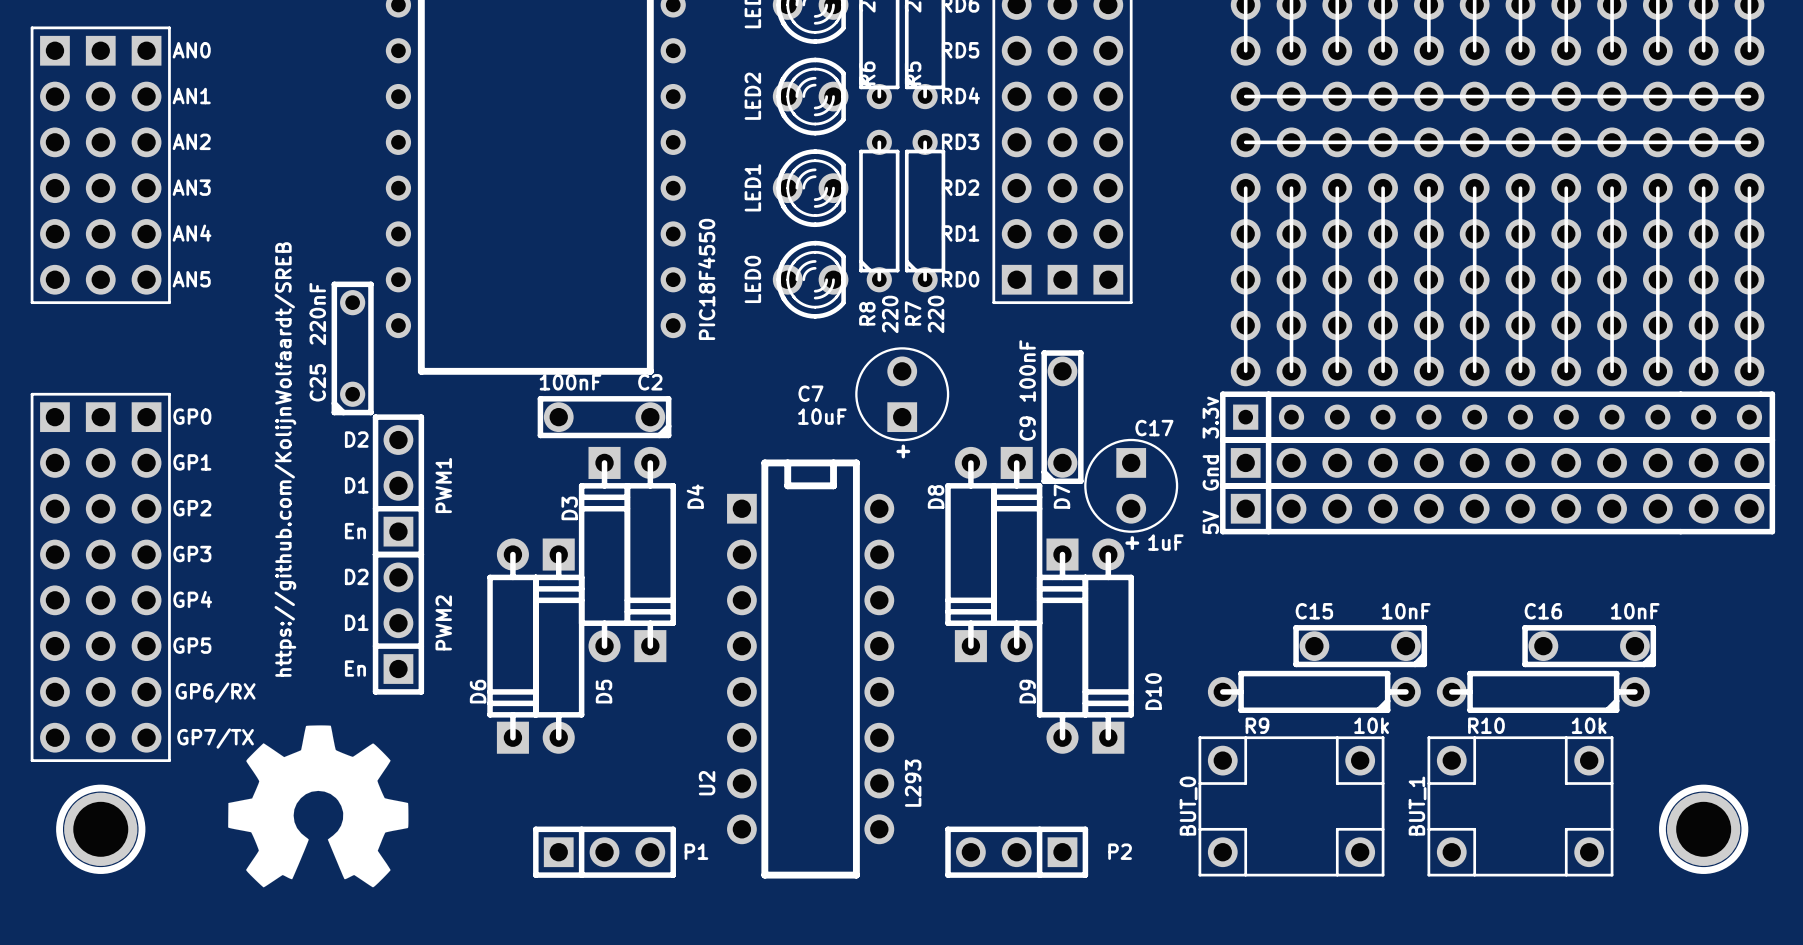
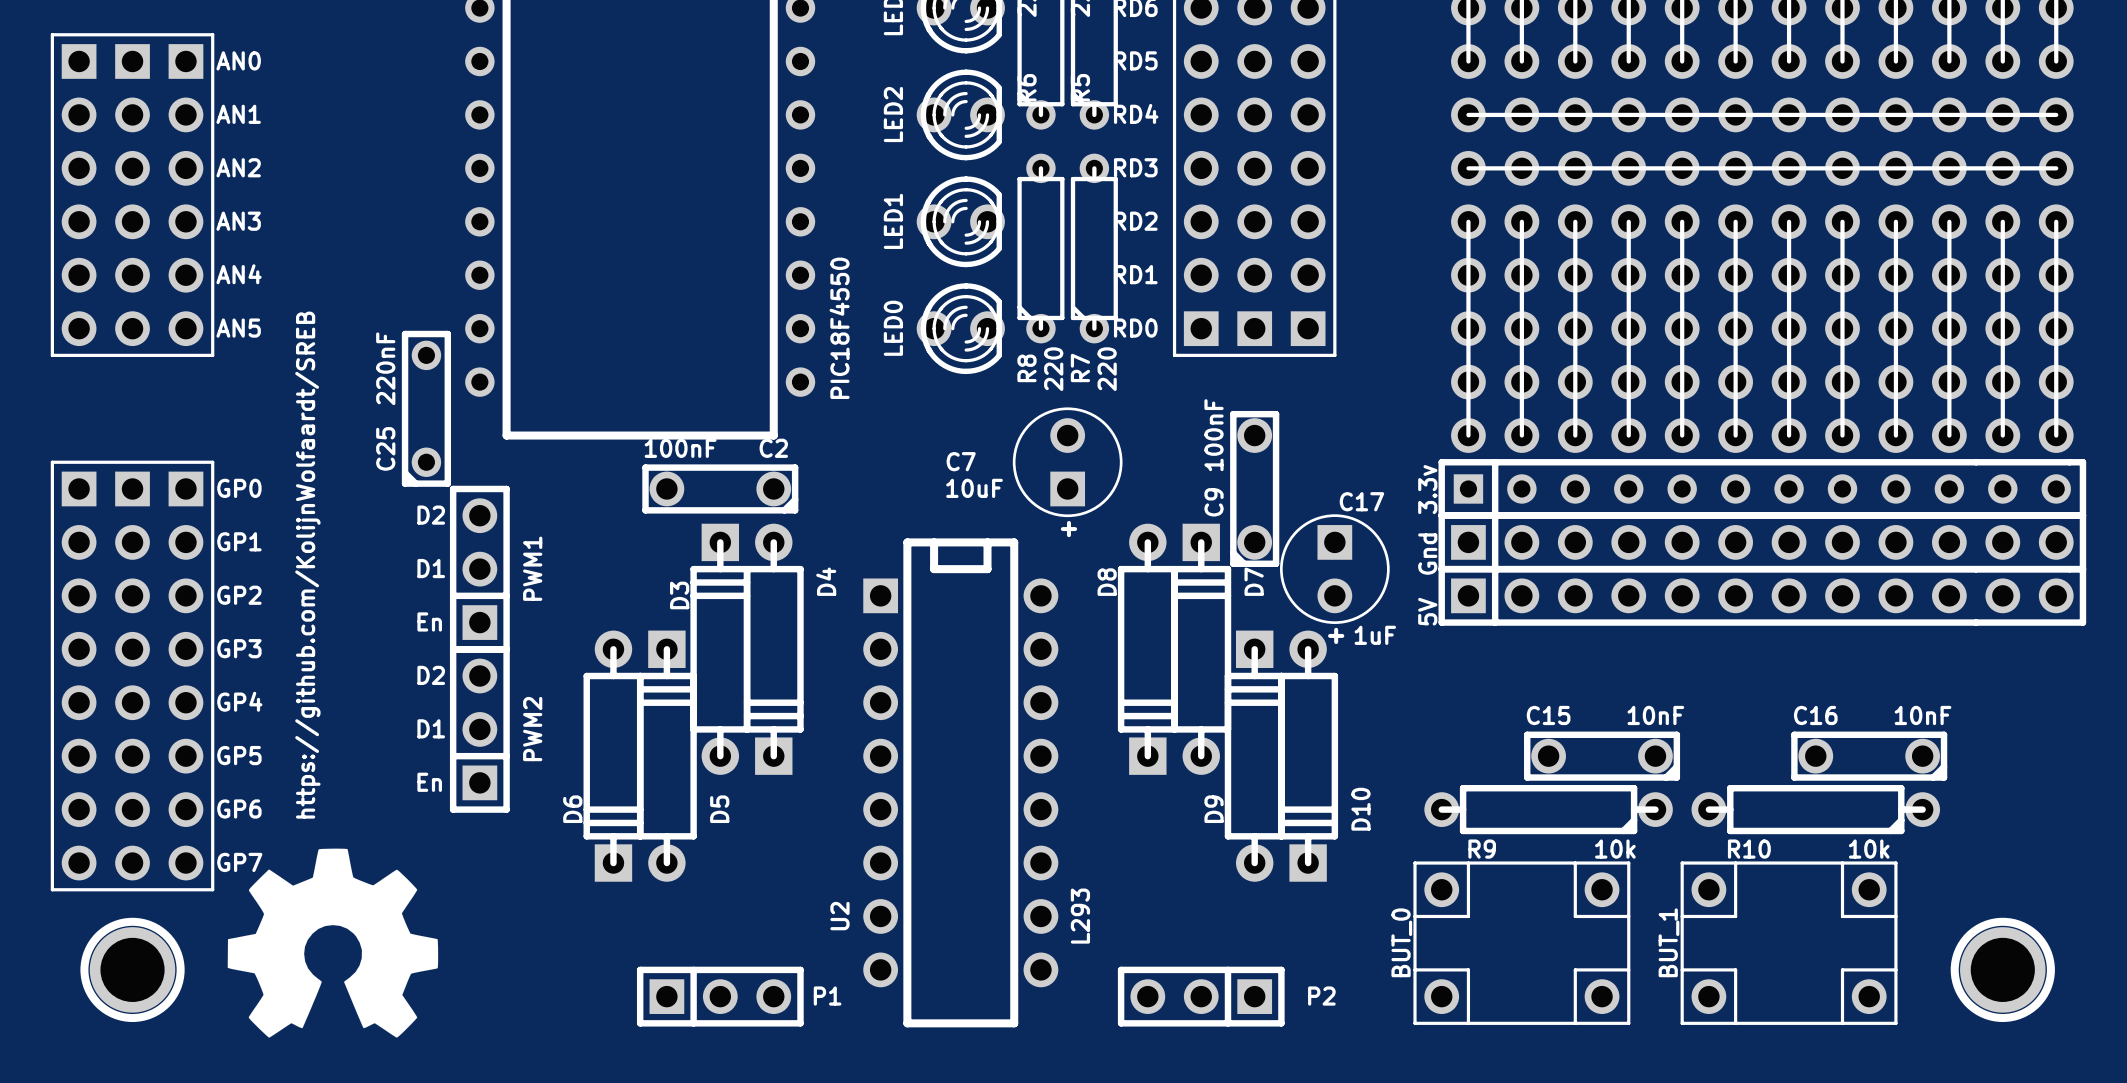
text position: https://github.com/KolijnWolfaardt/SREB (285, 459) -> https://github.com/KolijnWolfaardt/SREB (307, 565)
text: GP6/RX (215, 692) -> GP6 (239, 809)
text: GP7/TX (215, 738) -> GP7 (239, 862)
drawing position: (318, 806) -> (332, 943)

